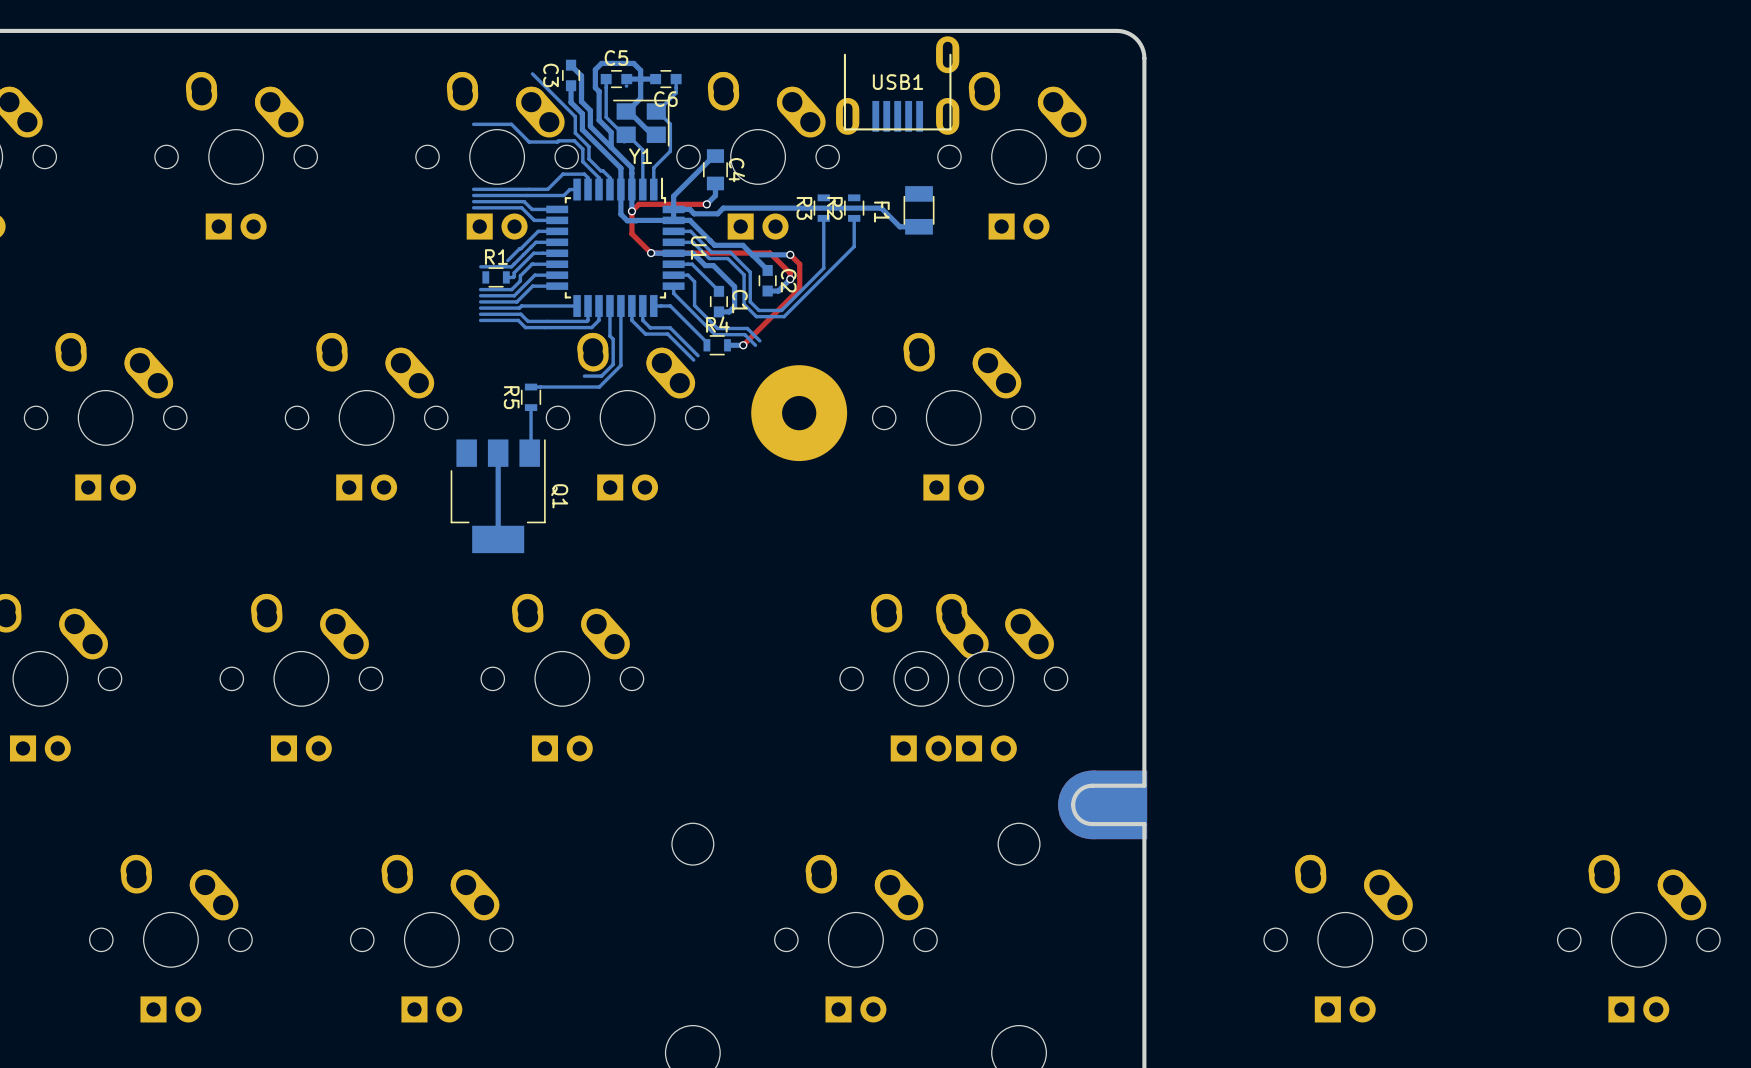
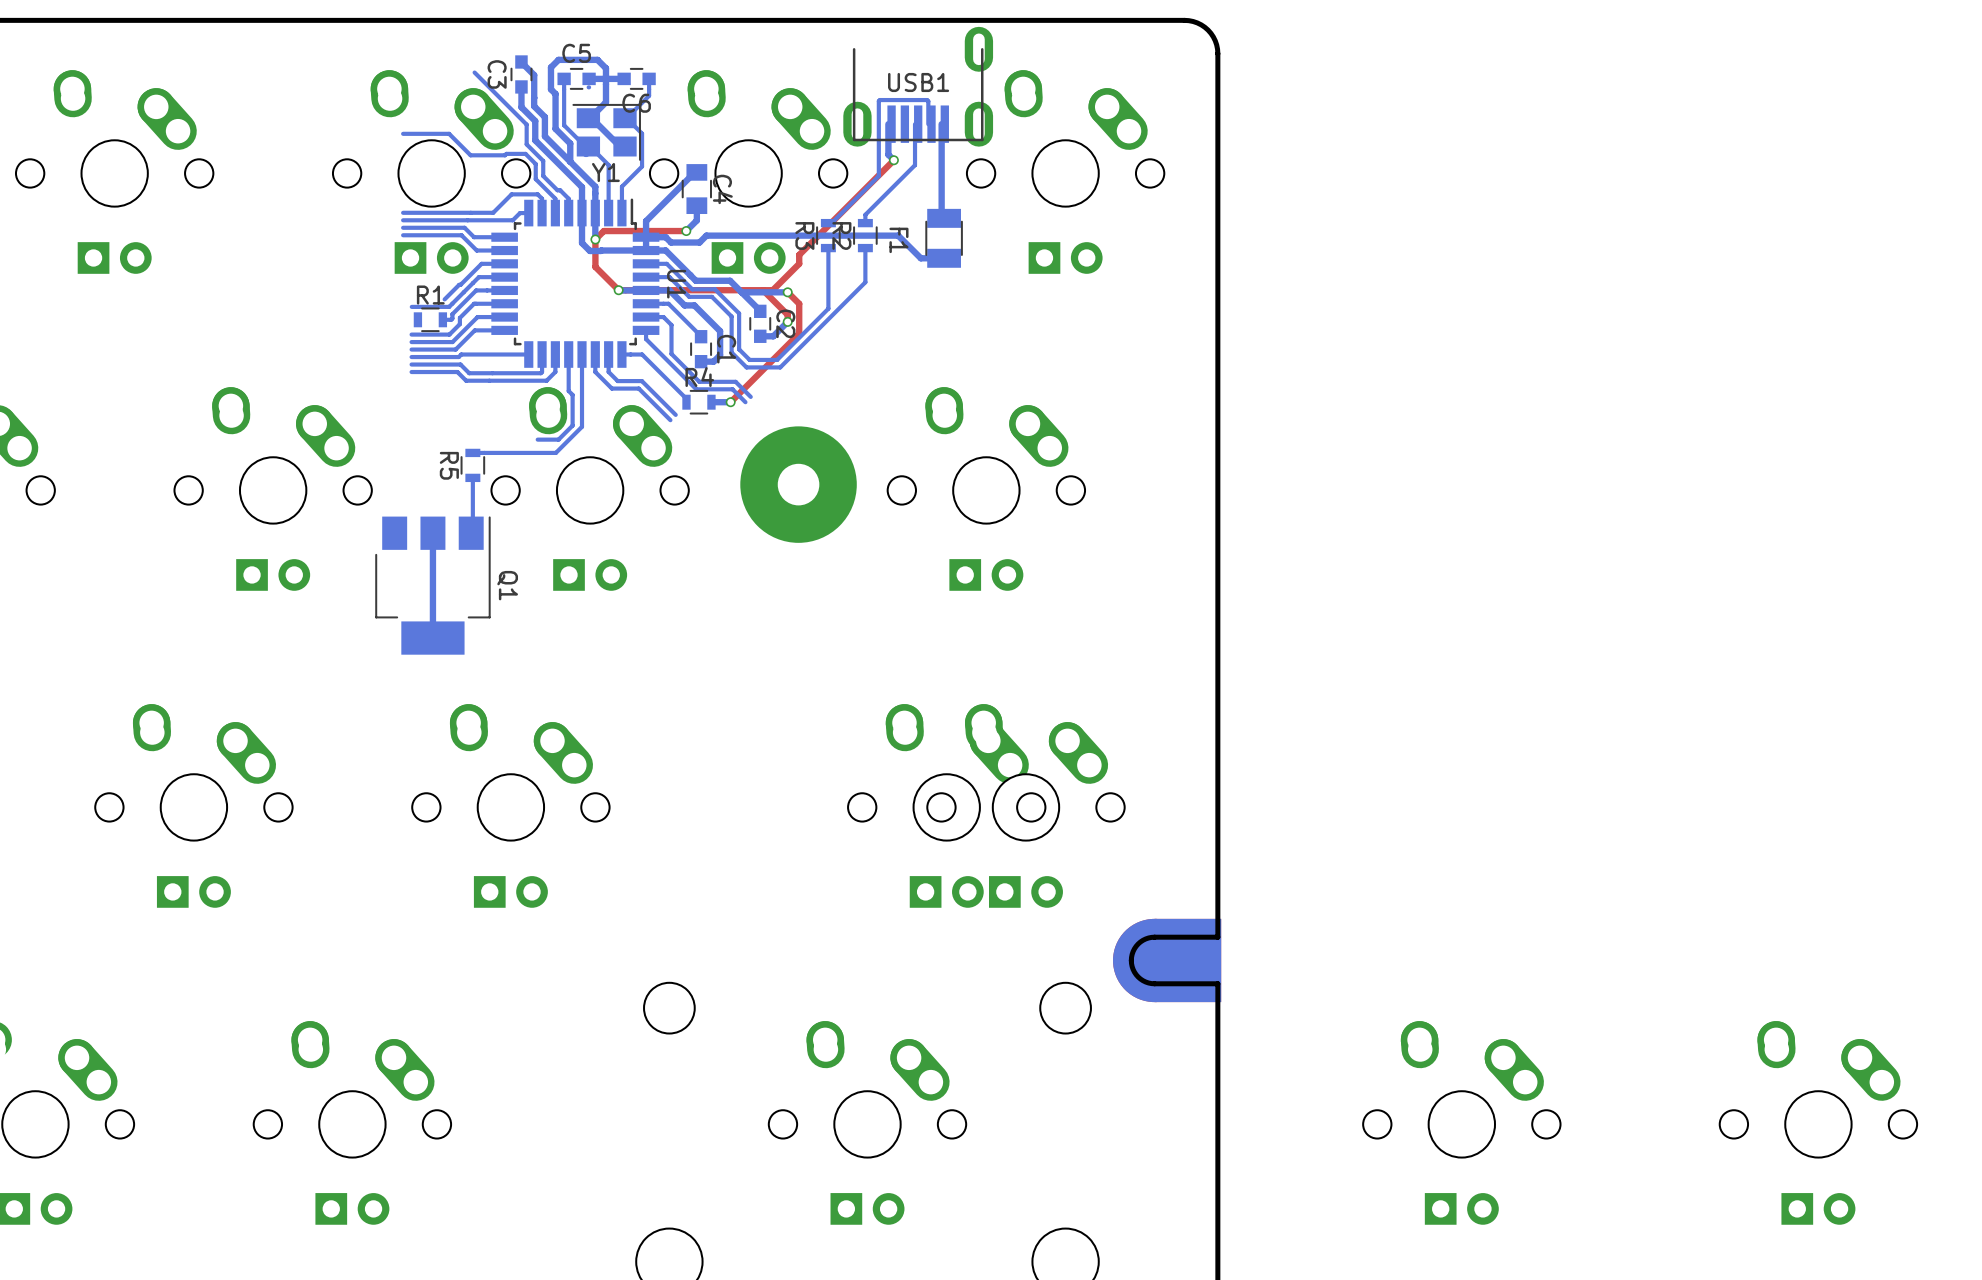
bottom track: none -> (888, 124) (888, 154) (893, 160)
bottom track: none -> (915, 124) (915, 165) (865, 214) (865, 223)
bottom track: none -> (928, 124) (927, 100) (879, 100) (878, 176) (831, 223) (828, 223)
bottom track: none -> (941, 124) (941, 215) (944, 218)
top track: none -> (893, 160) (799, 254) (799, 263) (772, 290) (763, 290)
via: none -> (893, 160)

